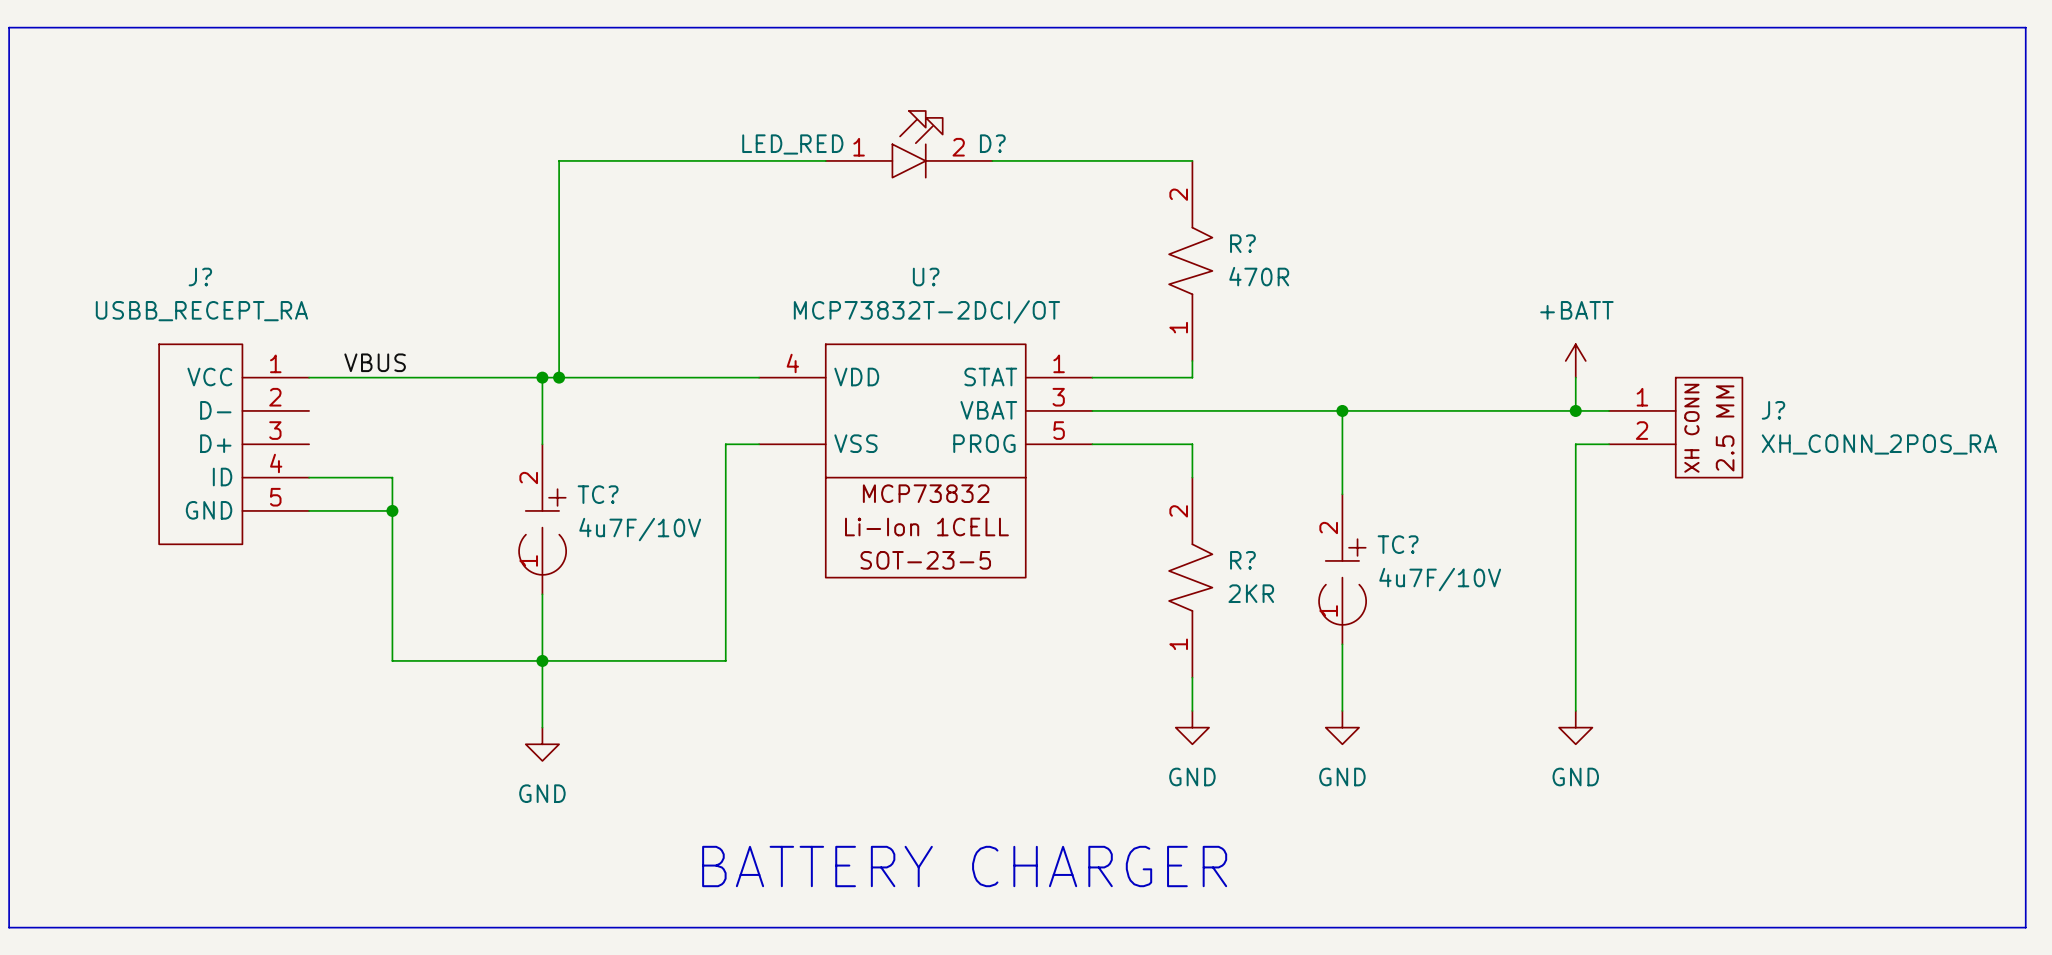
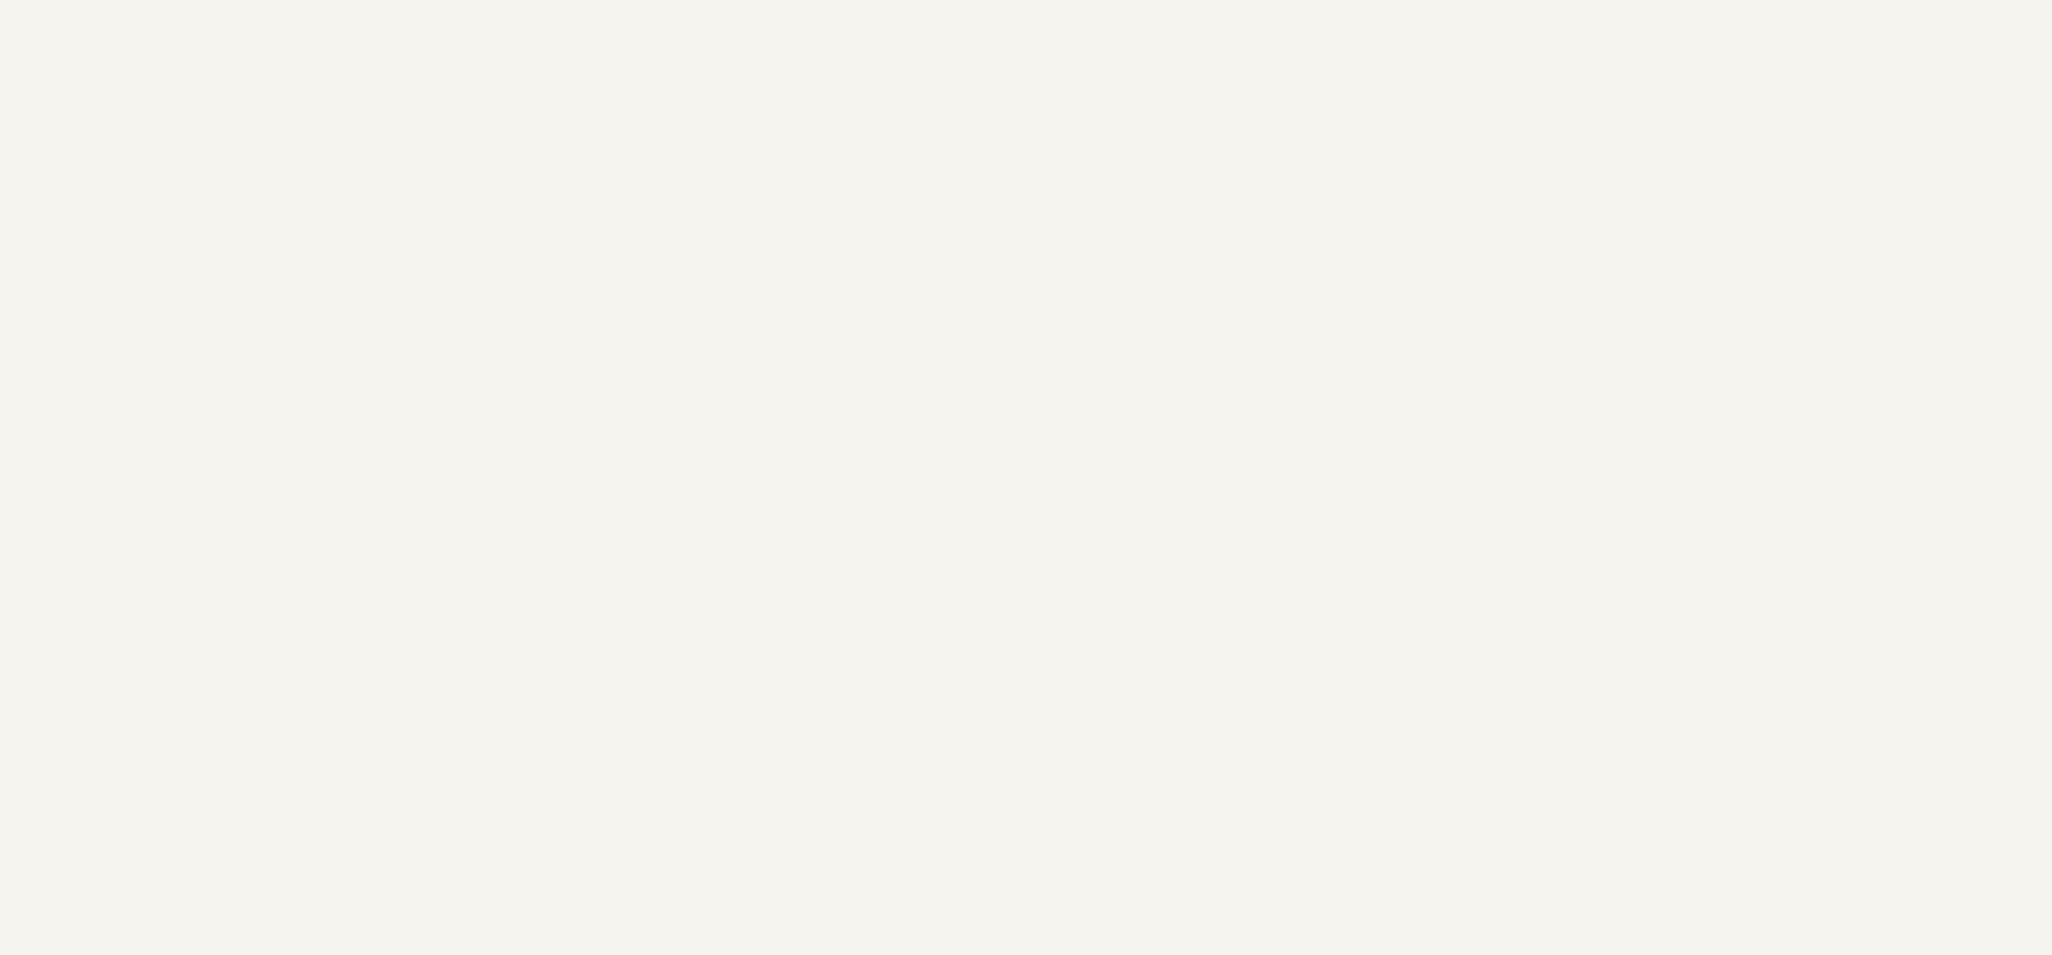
line: (9, 27) (2025, 27) (2025, 927) (9, 927) (9, 27) -> none
D?: LED_RED (909, 144) -> none
wire: (825, 160) (559, 160) (559, 377) -> none
wire: (992, 160) (1192, 160) -> none
R?: 470R (1190, 260) -> none
wire: (1192, 360) (1192, 377) (1092, 377) -> none
power symbol: +BATT (1575, 360) -> none
label: VBUS (375, 362) -> none
wire: (309, 377) (759, 377) -> none
wire: (542, 377) (542, 444) -> none
junction: (542, 377) -> none
junction: (559, 377) -> none
wire: (1575, 377) (1575, 410) -> none
wire: (1092, 410) (1609, 410) -> none
wire: (1342, 410) (1342, 494) -> none
junction: (1342, 410) -> none
junction: (1575, 410) -> none
J?: XH_CONN_2POS_RA (1675, 427) -> none
J?: USBB_RECEPT_RA (234, 444) -> none
wire: (759, 444) (725, 444) (725, 660) (392, 660) (392, 477) (309, 477) -> none
wire: (1092, 444) (1192, 444) (1192, 477) -> none
wire: (1609, 444) (1575, 444) (1575, 710) -> none
U?: MCP73832T-2DCI/OT (925, 460) -> none
wire: (309, 510) (392, 510) -> none
junction: (392, 510) -> none
TC?: 4u7F/10V (542, 519) -> none
TC?: 4u7F/10V (1342, 569) -> none
R?: 2KR (1190, 577) -> none
wire: (542, 594) (542, 727) -> none
wire: (1342, 644) (1342, 710) -> none
junction: (542, 660) -> none
wire: (1192, 677) (1192, 710) -> none
power symbol: GND (1192, 727) -> none
power symbol: GND (1342, 727) -> none
power symbol: GND (1575, 727) -> none
power symbol: GND (542, 744) -> none
text: BATTERY CHARGER (964, 866) -> none

